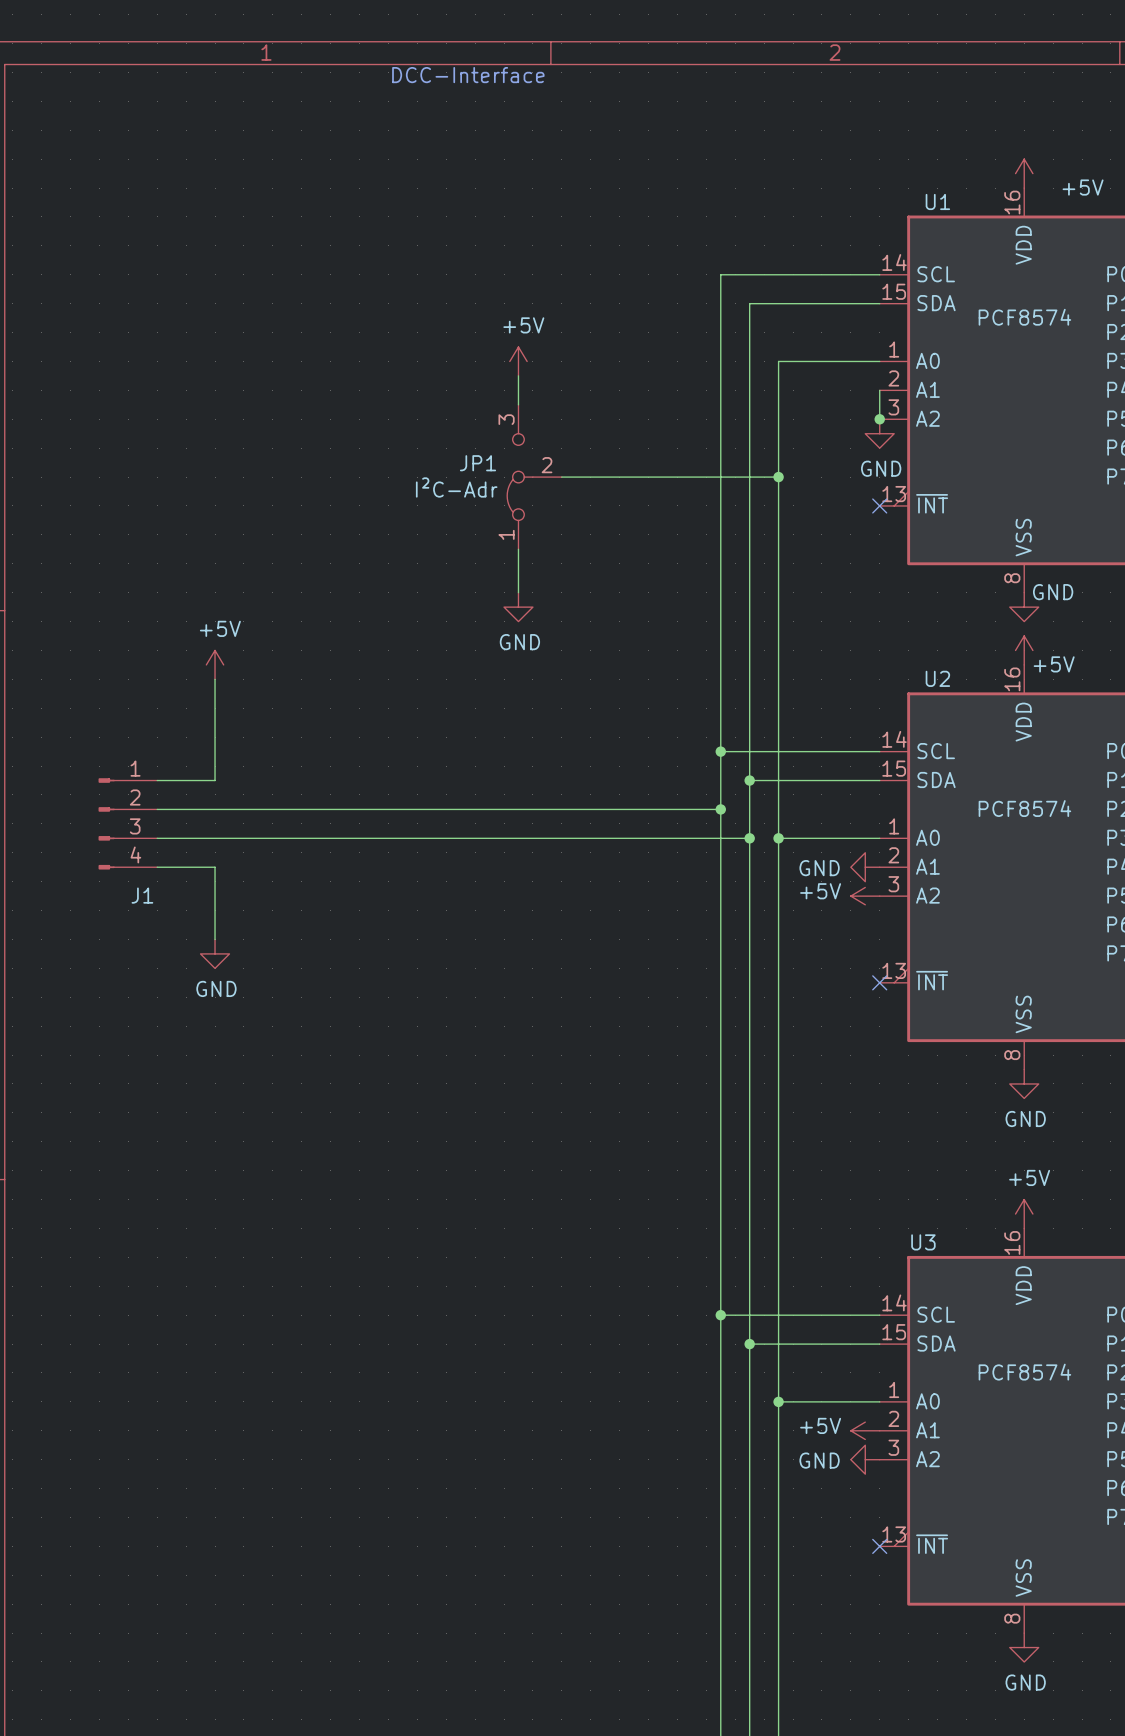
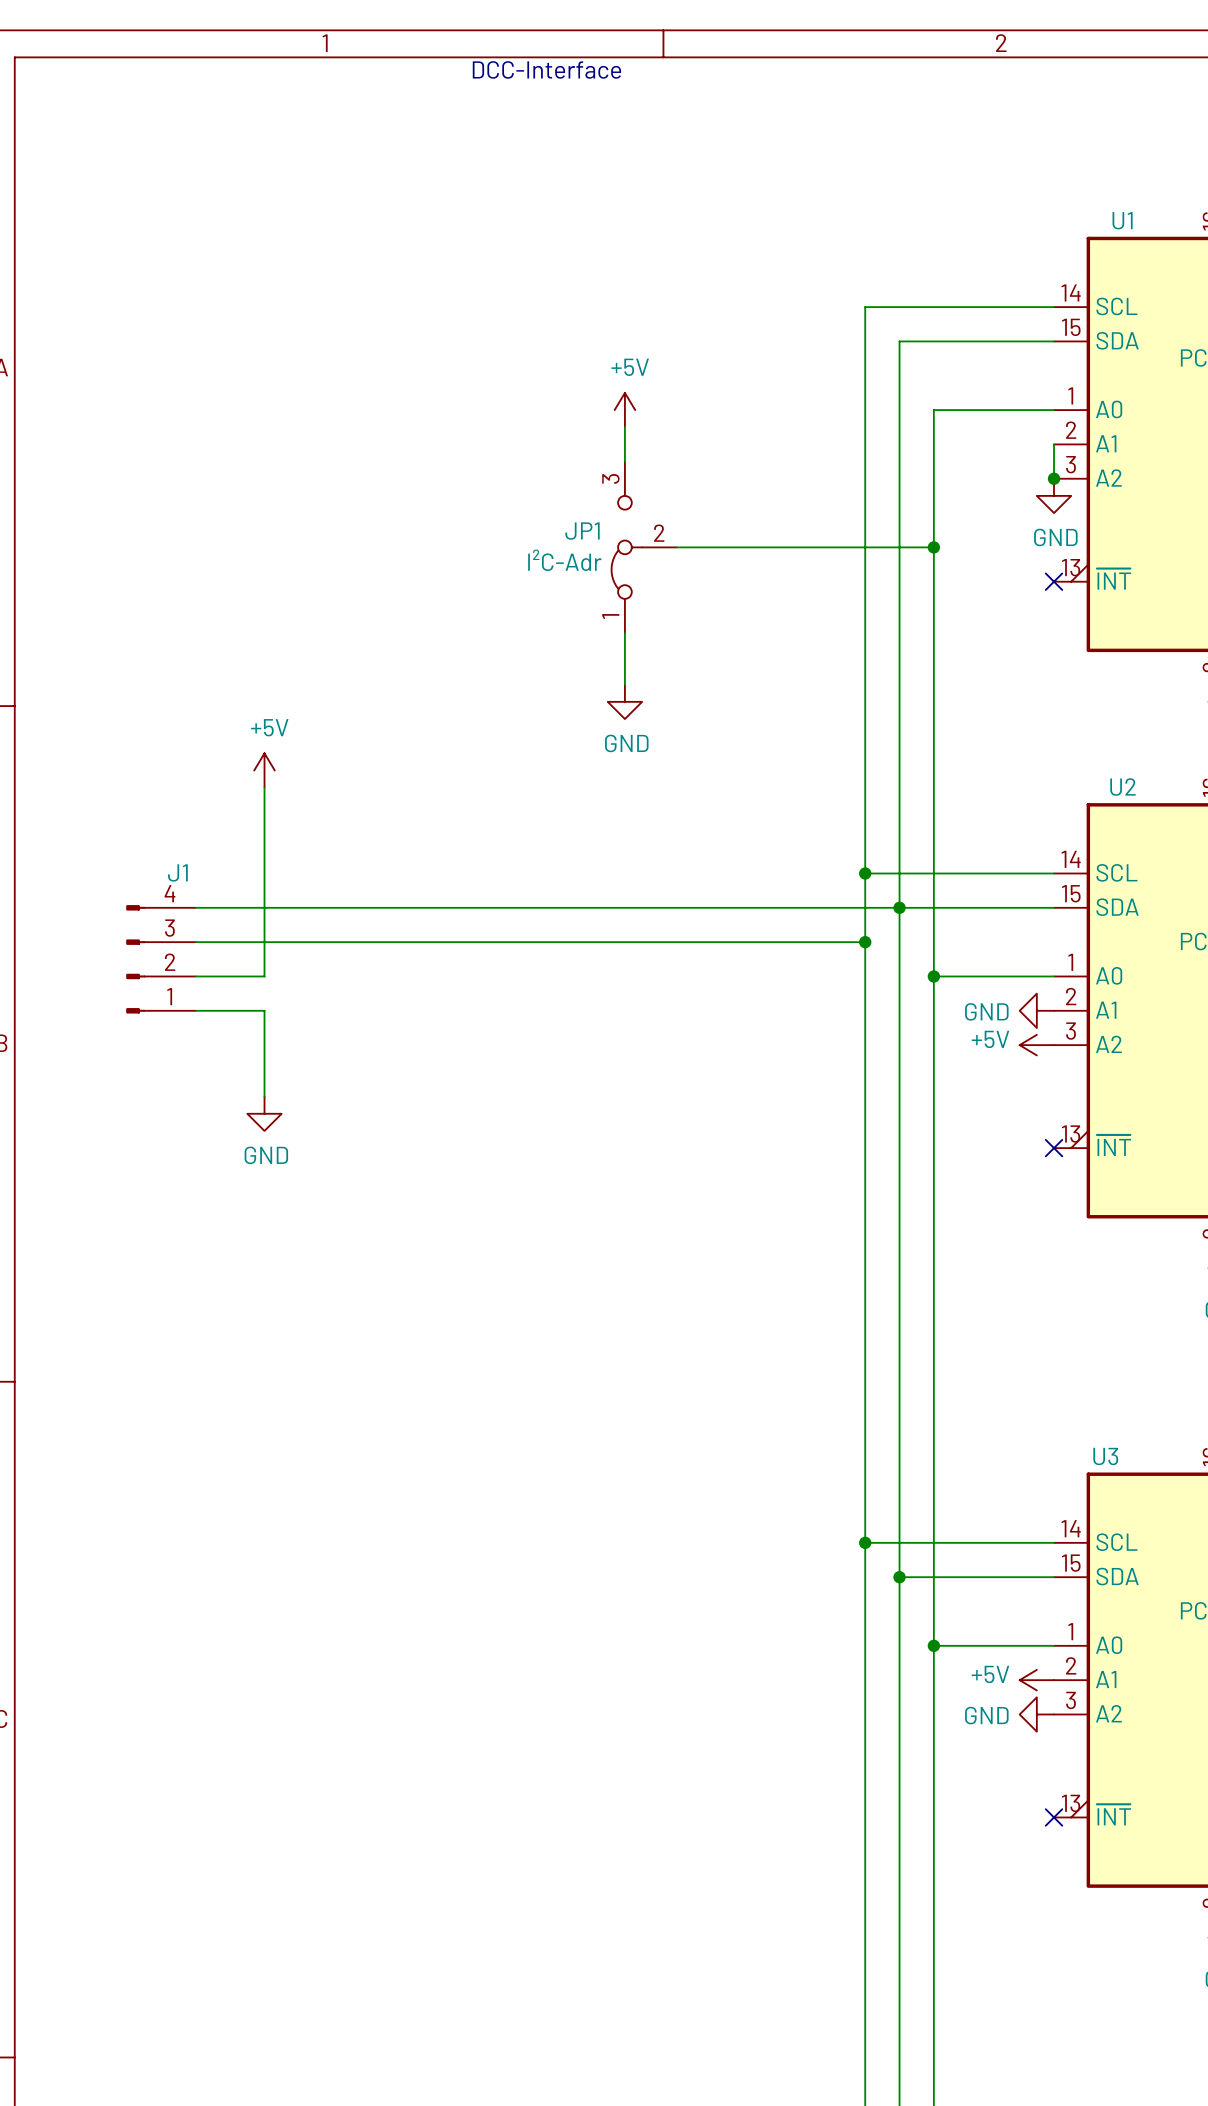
J1 flip: as is (106, 823) -> up-down (135, 959)
wire: (215, 838) (749, 838) -> (264, 976) (264, 907) (899, 907)
junction: (749, 838) -> none

